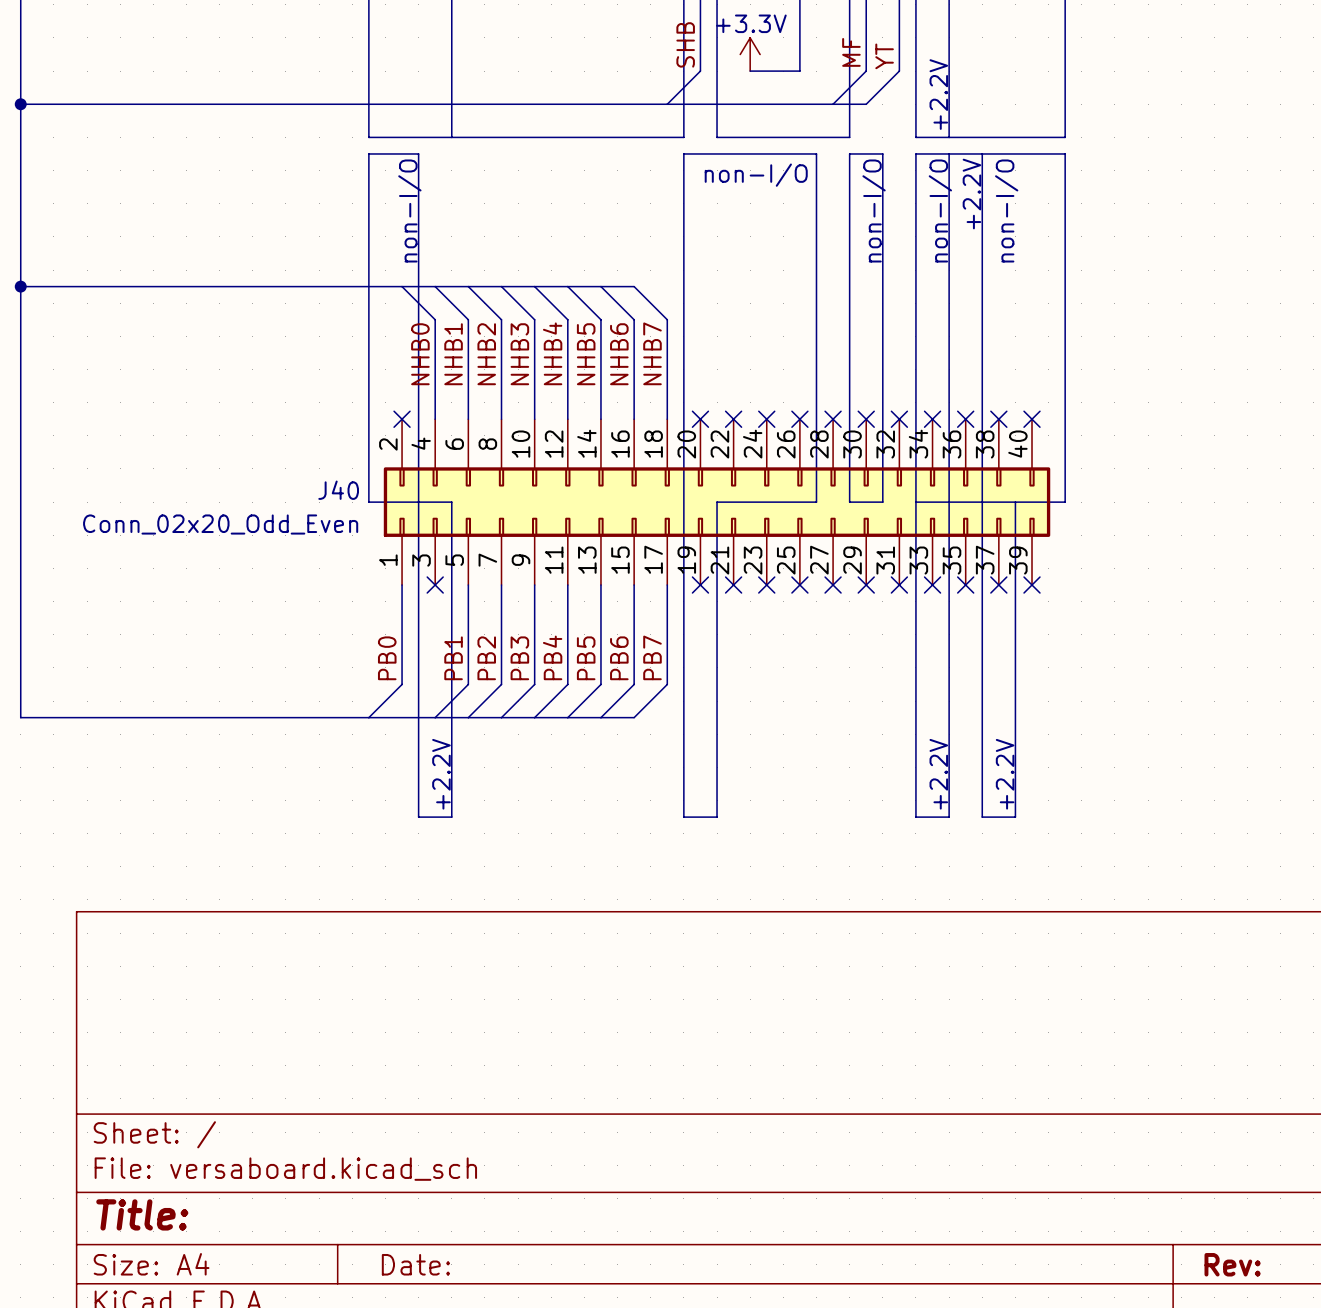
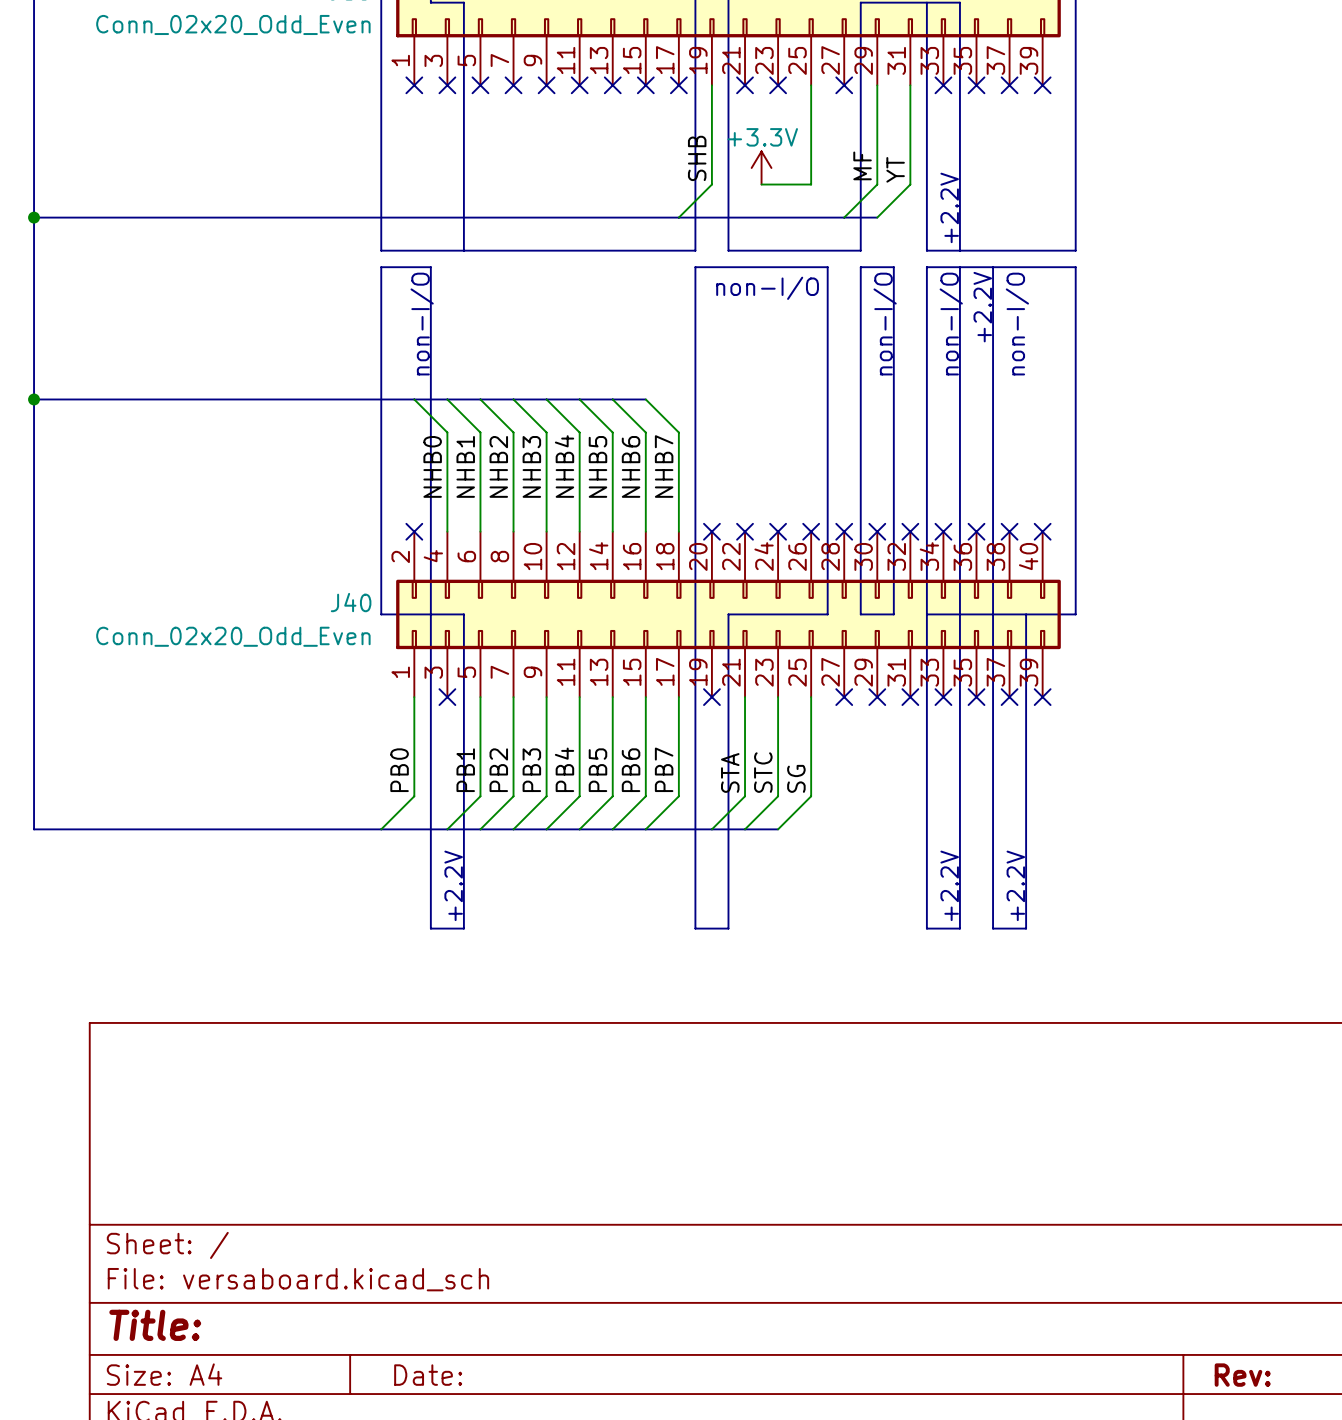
wire: none -> (745, 697) (745, 796) (711, 829)
no-connect mark: (733, 585) -> none
wire: none -> (778, 697) (778, 796) (745, 829)
no-connect mark: (766, 585) -> none
wire: none -> (811, 697) (811, 796) (778, 829)
no-connect mark: (799, 585) -> none
label: none -> STC (763, 772)
label: none -> STA (730, 772)
label: none -> SG (796, 778)
bus: none -> (645, 829) (778, 829)

